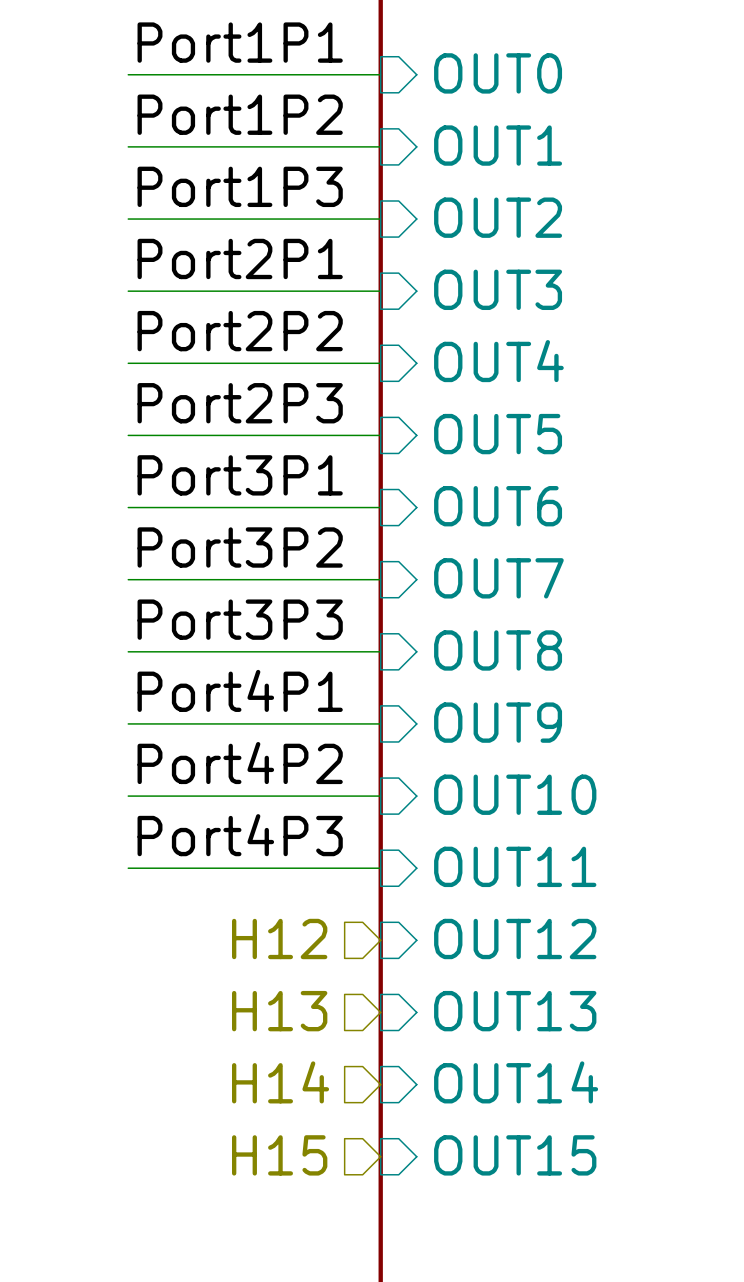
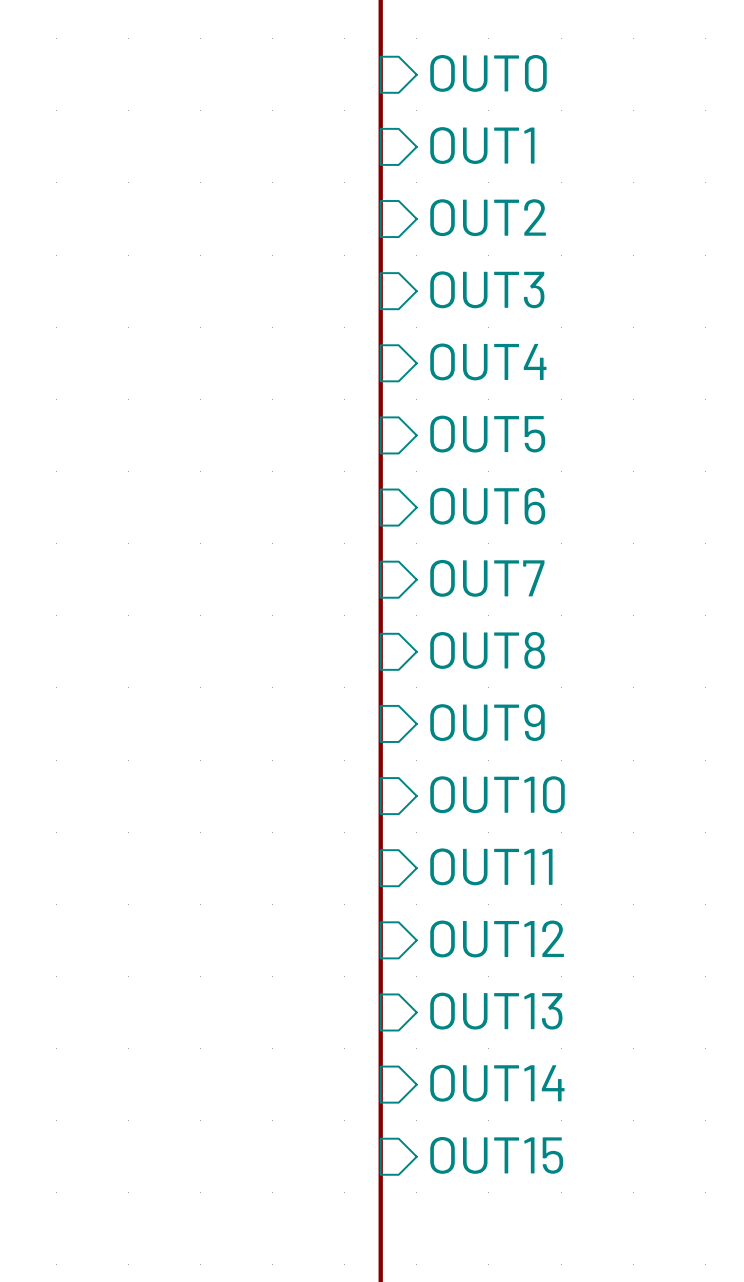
label: Port1P1 (240, 42) -> none
wire: (128, 74) (380, 74) -> none
label: Port1P2 (240, 114) -> none
wire: (128, 146) (380, 146) -> none
label: Port1P3 (240, 186) -> none
wire: (128, 219) (380, 219) -> none
label: Port2P1 (240, 258) -> none
wire: (128, 291) (380, 291) -> none
label: Port2P2 (240, 331) -> none
wire: (128, 363) (380, 363) -> none
label: Port2P3 (240, 403) -> none
wire: (128, 435) (380, 435) -> none
label: Port3P1 (240, 475) -> none
wire: (128, 507) (380, 507) -> none
label: Port3P2 (240, 547) -> none
wire: (128, 579) (380, 579) -> none
label: Port3P3 (240, 619) -> none
wire: (128, 651) (380, 651) -> none
label: Port4P1 (240, 690) -> none
wire: (128, 723) (380, 723) -> none
label: Port4P2 (240, 763) -> none
wire: (128, 796) (380, 796) -> none
label: Port4P3 (240, 835) -> none
wire: (128, 868) (380, 868) -> none
hierarchical label: H12 (279, 938) -> none
hierarchical label: H13 (279, 1011) -> none
hierarchical label: H14 (280, 1082) -> none
hierarchical label: H15 (279, 1155) -> none

